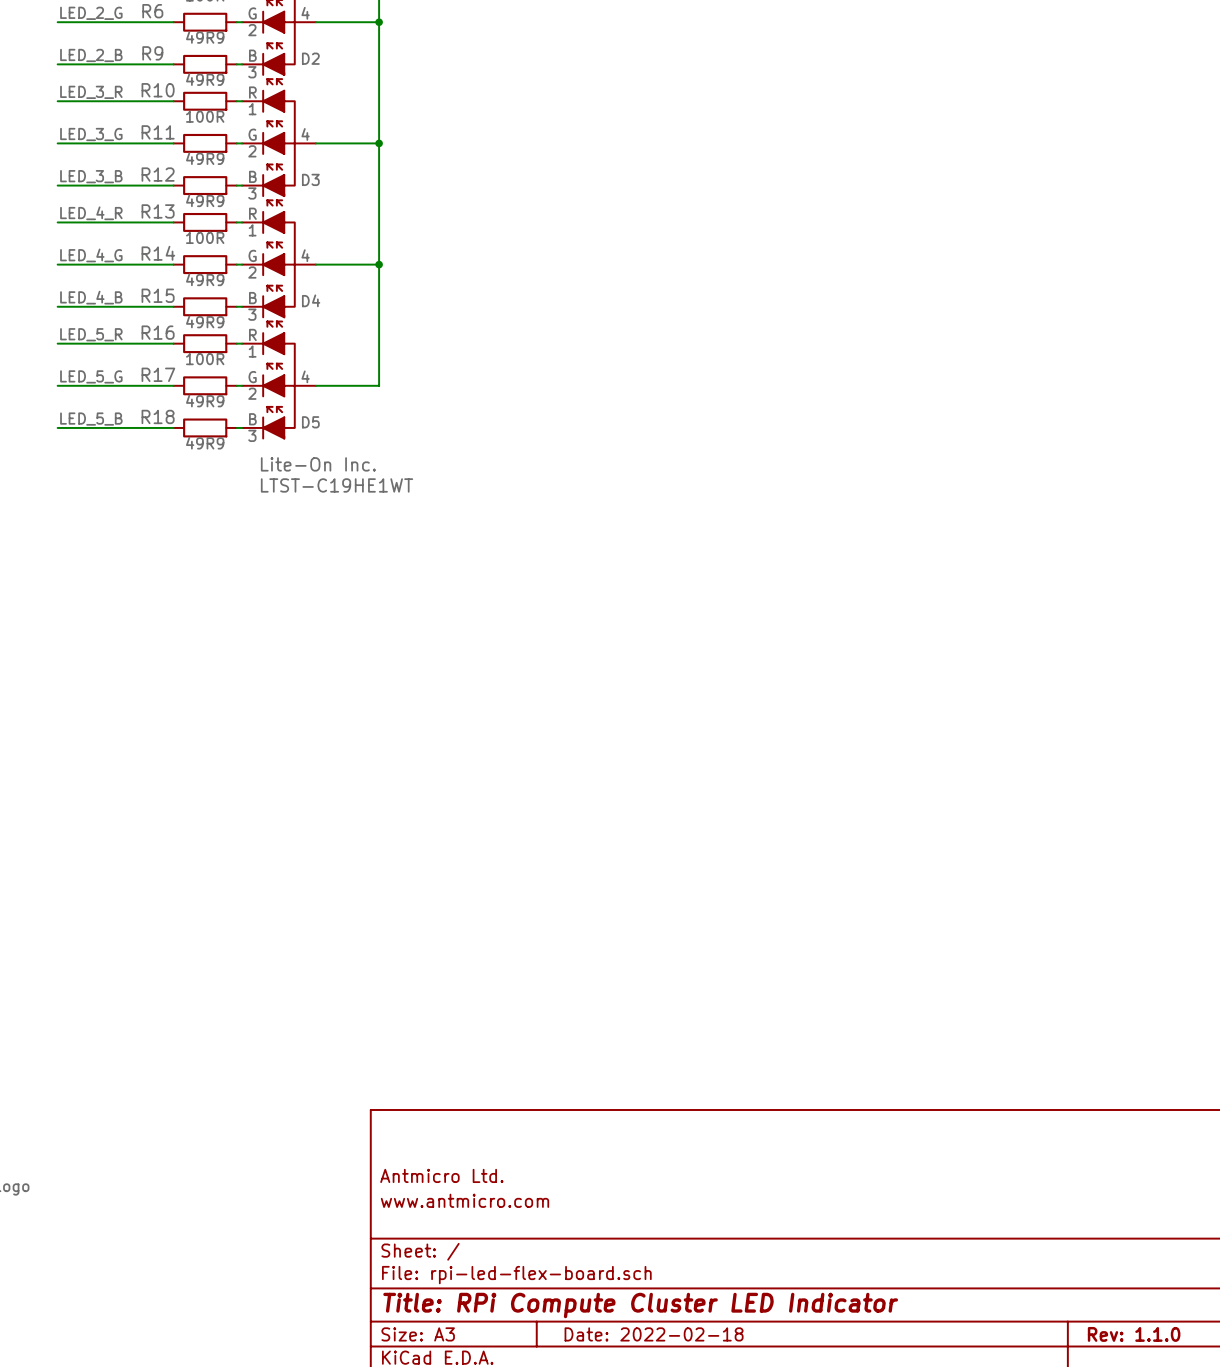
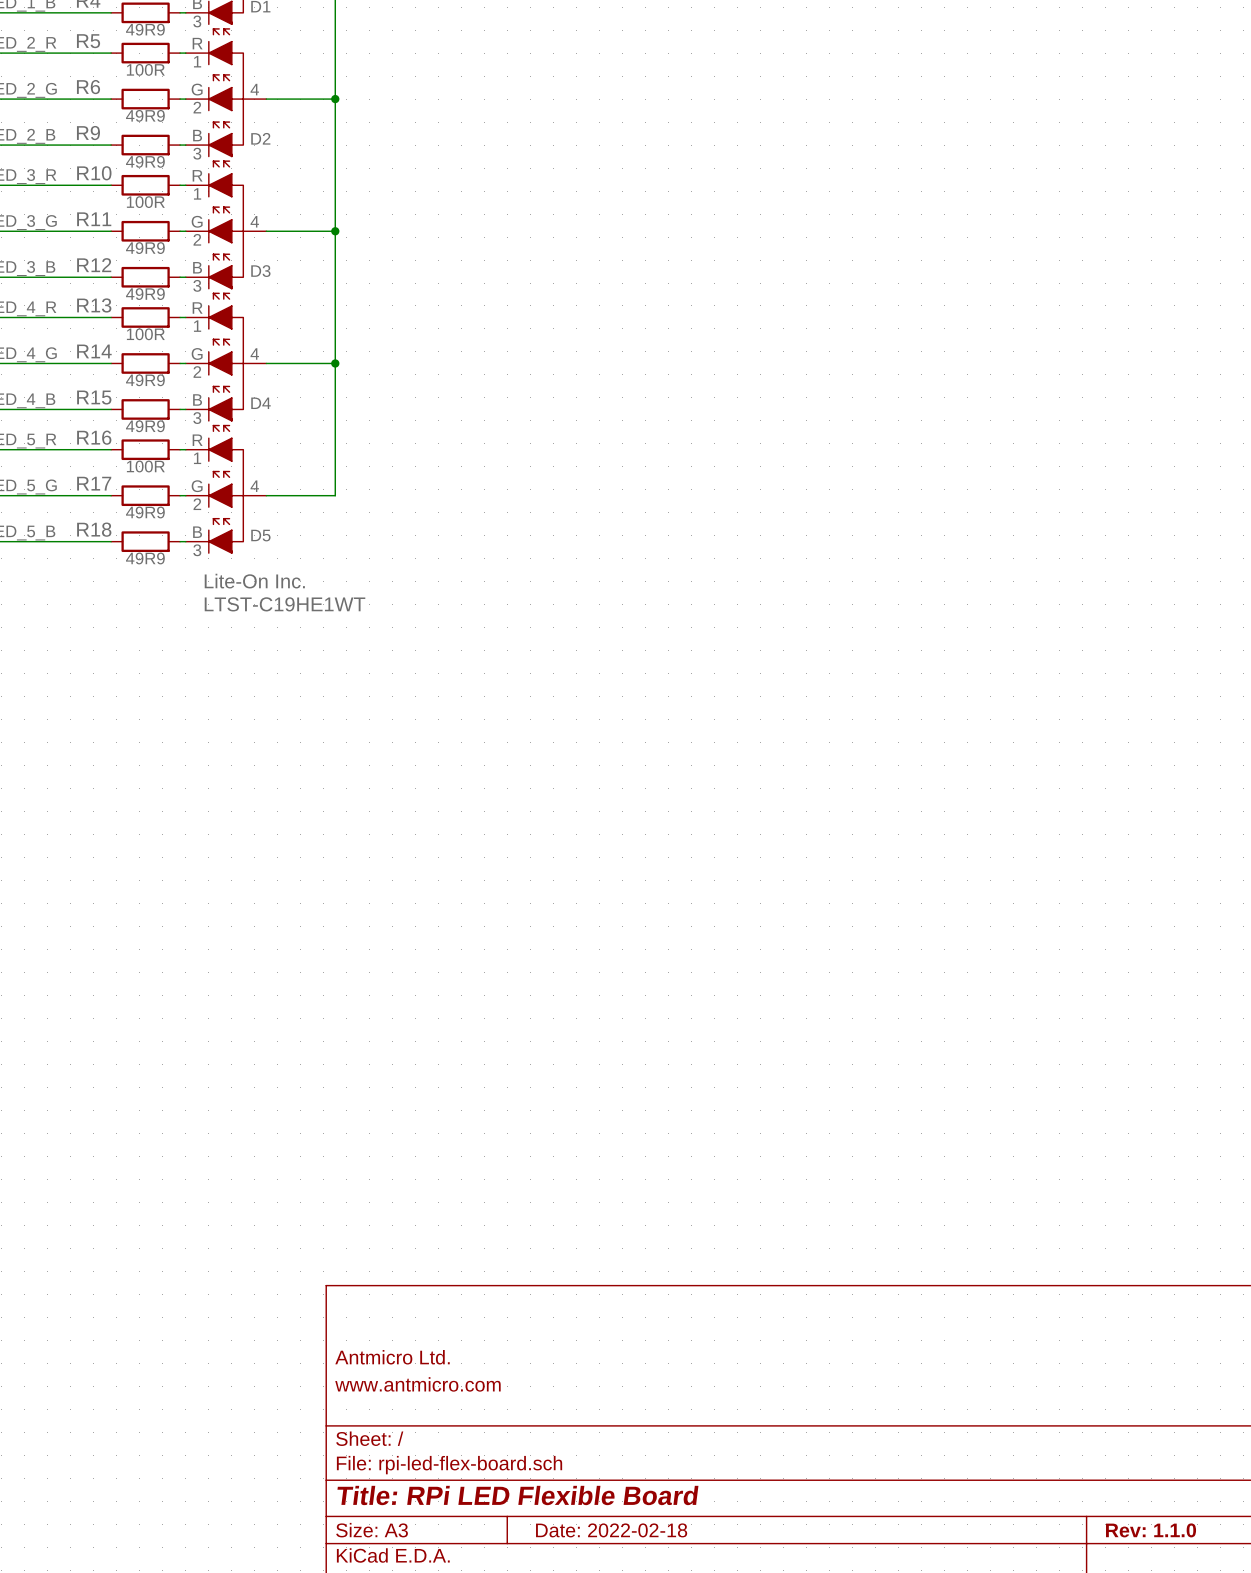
title block: Title: RPi Compute Cluster LED Indicator (640, 1305) -> Title: RPi LED Flexible Board (517, 1495)

